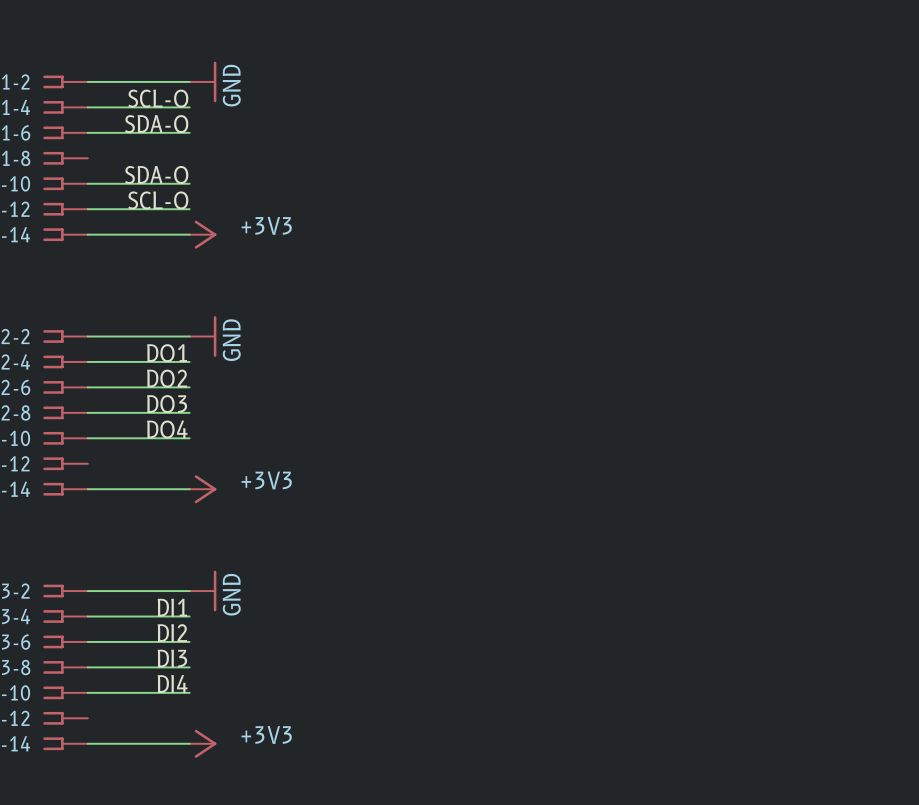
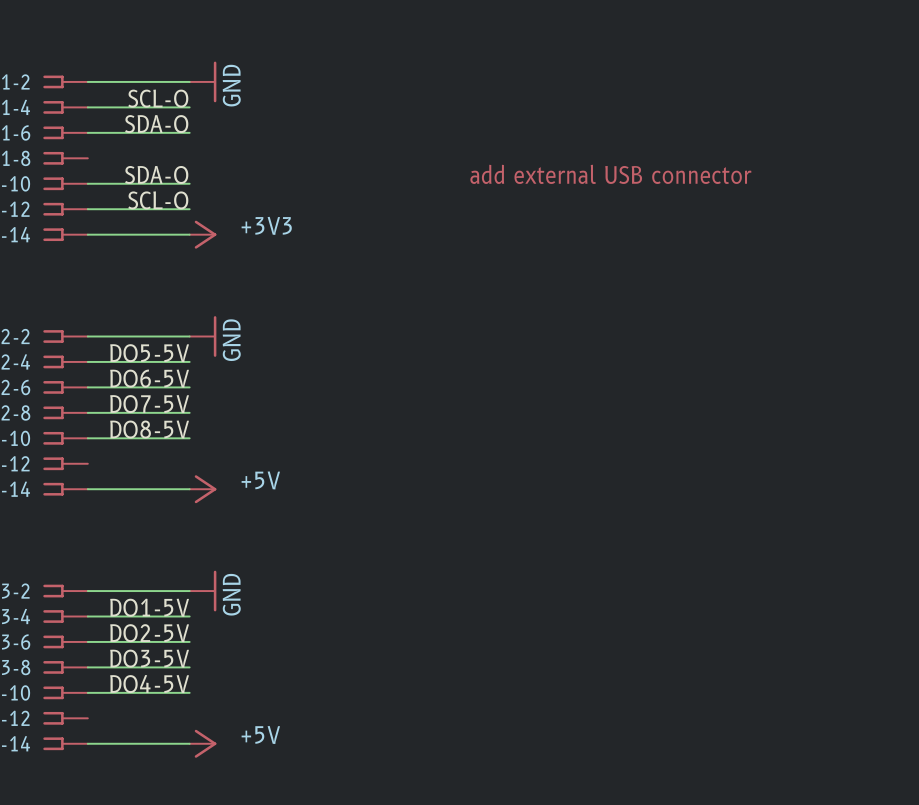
text: none -> add external USB connector (610, 174)
label: DO1 (167, 353) -> DO5-5V (149, 353)
label: DO2 (167, 378) -> DO6-5V (149, 378)
label: DO3 (167, 404) -> DO7-5V (149, 404)
label: DO4 (167, 429) -> DO8-5V (149, 429)
power symbol: +3V3 (203, 489) -> +5V (203, 489)
label: DI1 (172, 607) -> DO1-5V (149, 607)
label: DI2 (172, 633) -> DO2-5V (149, 633)
label: DI3 (172, 658) -> DO3-5V (149, 658)
label: DI4 (172, 683) -> DO4-5V (149, 684)
power symbol: +3V3 (203, 743) -> +5V (203, 743)

